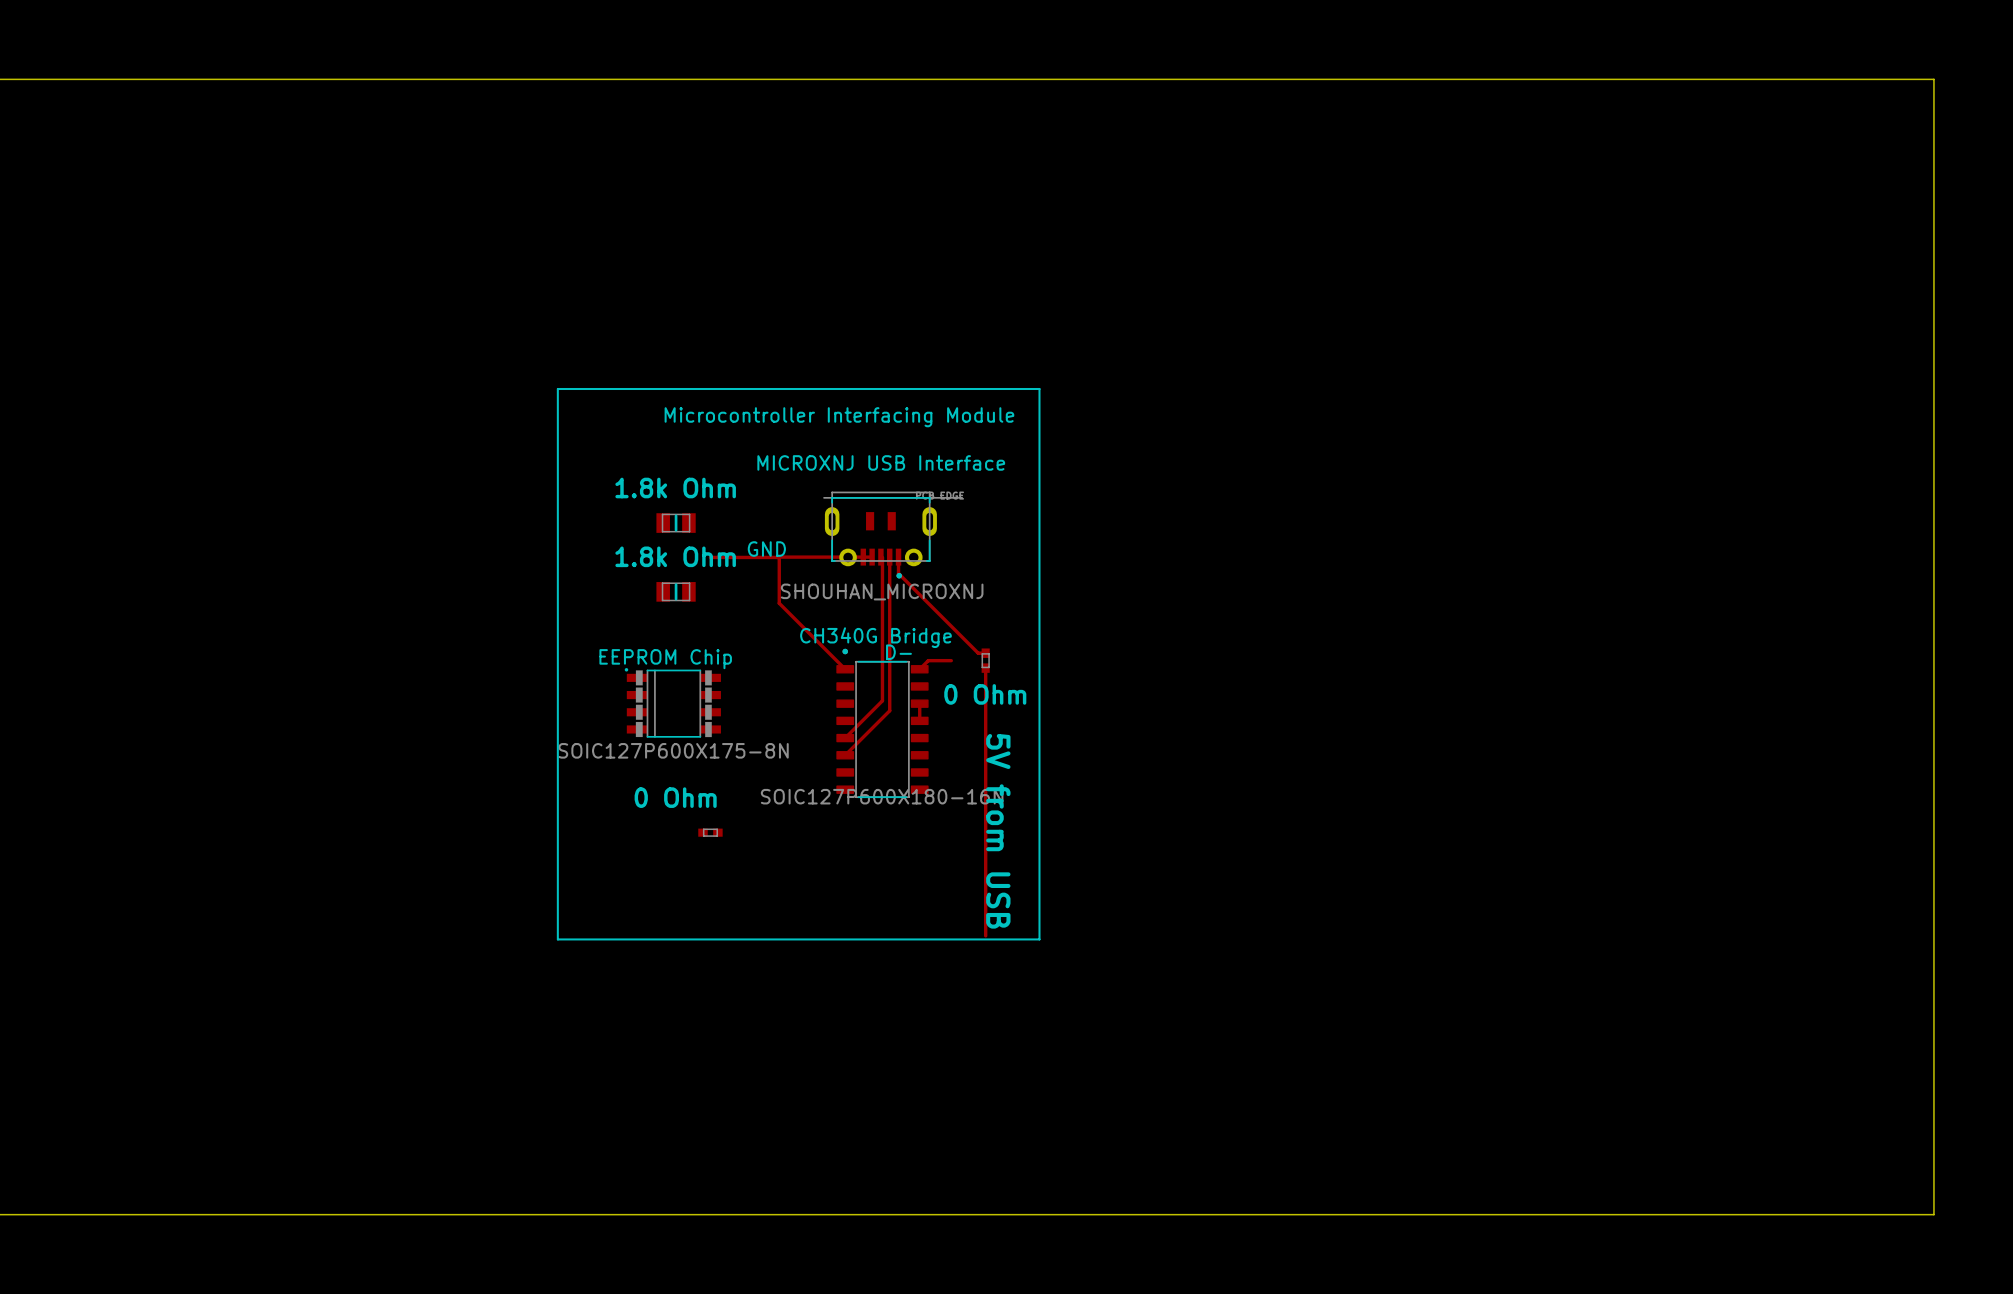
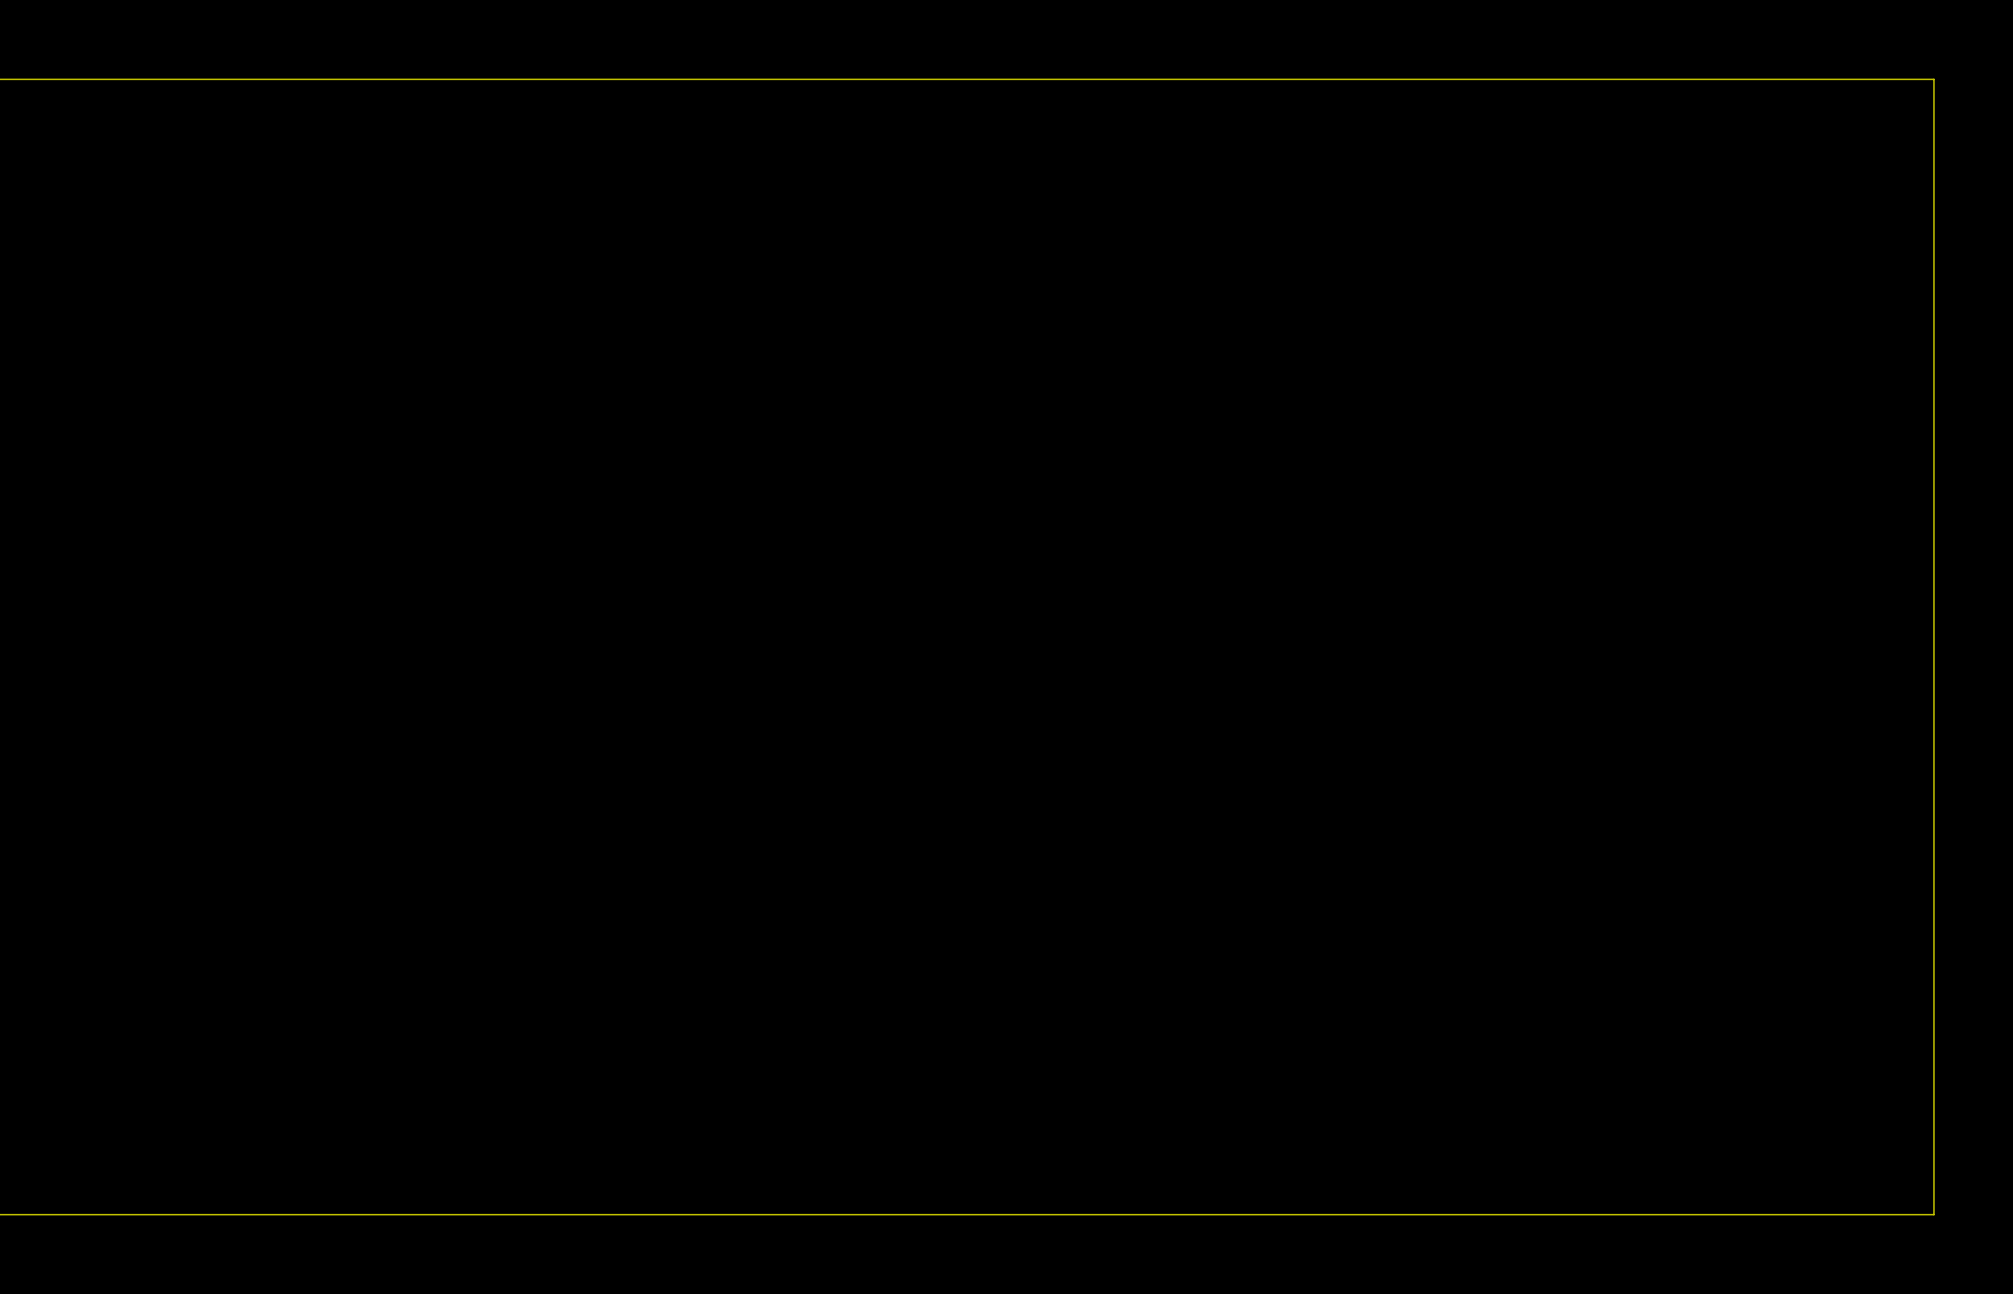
line: (557, 388) (557, 939) (1039, 939) (1039, 388) (557, 388) -> none
text: Microcontroller Interfacing Module (839, 417) -> none
1.8k Ohm: (676, 523) -> none
MICROXNJ USB Interface: SHOUHAN_MICROXNJ (893, 535) -> none
text: GND (766, 549) -> none
top track: (710, 557) (779, 557) -> none
top track: (779, 557) (779, 603) (845, 669) -> none
top track: (872, 557) (779, 557) -> none
top track: (882, 557) (882, 700) (845, 738) -> none
top track: (889, 557) (889, 710) (845, 755) -> none
top track: (898, 557) (898, 573) (978, 653) (985, 653) -> none
1.8k Ohm: (676, 591) -> none
text: D- (898, 652) -> none
top track: (951, 660) (928, 660) (919, 669) -> none
0 Ohm: (985, 660) -> none
top track: (985, 668) (985, 935) -> none
EEPROM Chip: SOIC127P600X175-8N (672, 702) -> none
top track: (919, 703) (919, 720) -> none
CH340G Bridge: SOIC127P600X180-16N (882, 723) -> none
text: 5V from USB (998, 831) -> none
0 Ohm: (710, 832) -> none

